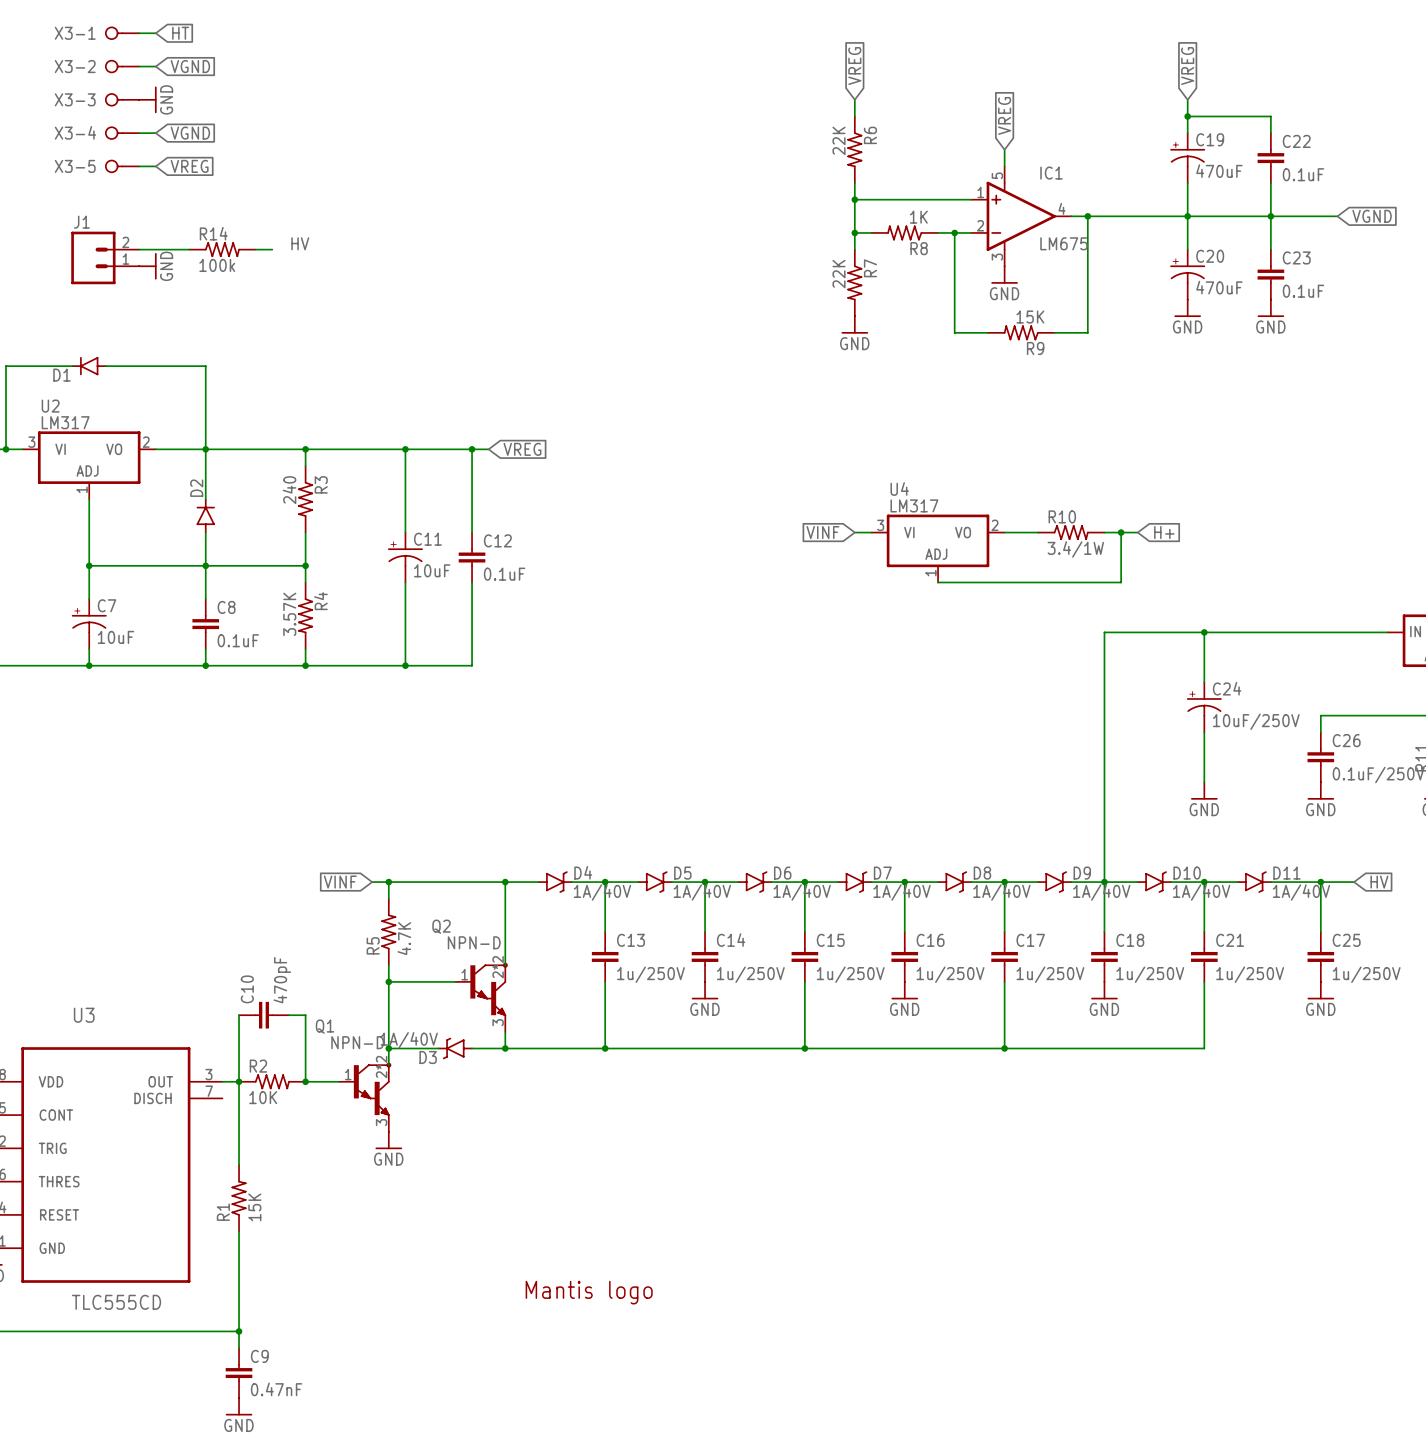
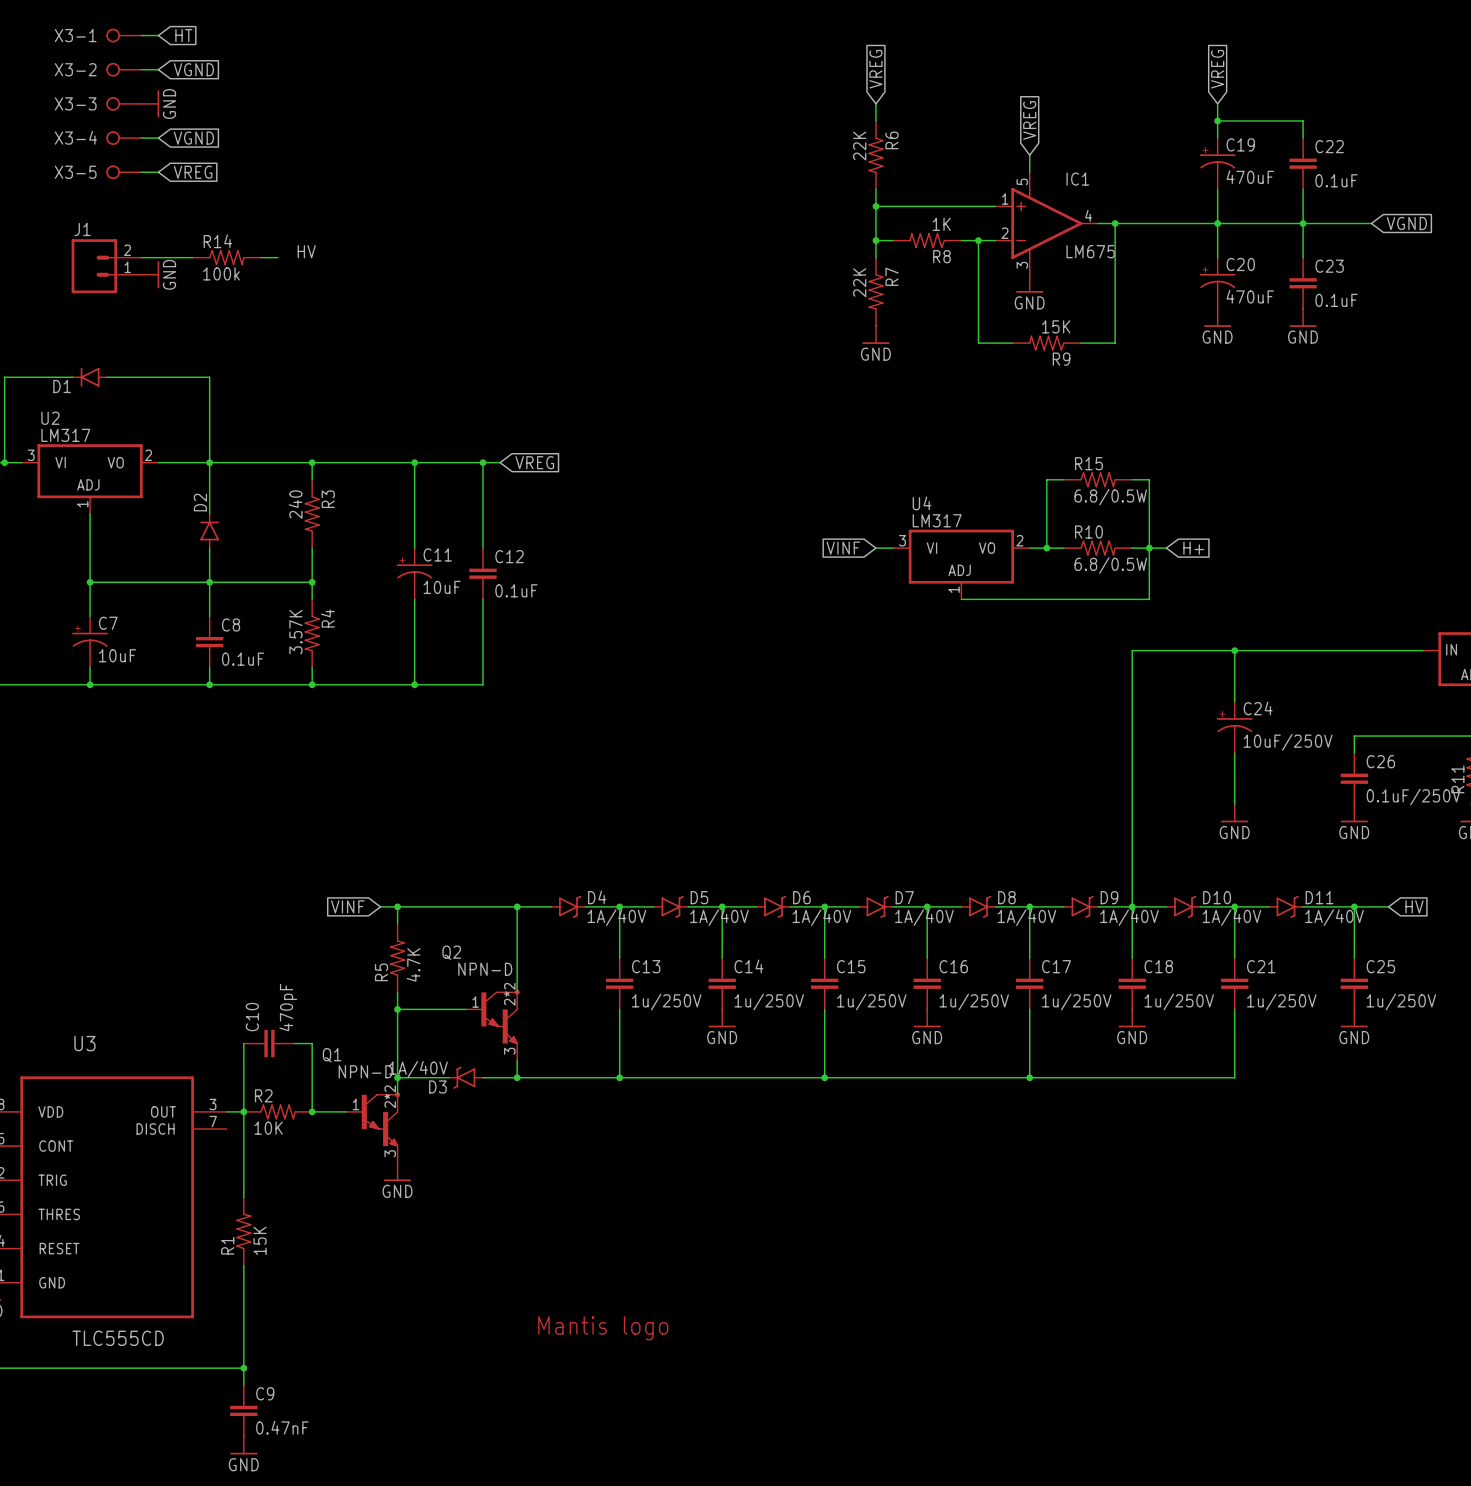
wire: none -> (1063, 479) (1046, 479) (1046, 548)
R15: none -> 6.8/0.5W (1098, 479)
wire: none -> (1132, 479) (1149, 479) (1149, 548)
junction: none -> (1046, 548)
R10 value: 3.4/1W (1075, 549) -> 6.8/0.5W (1110, 565)

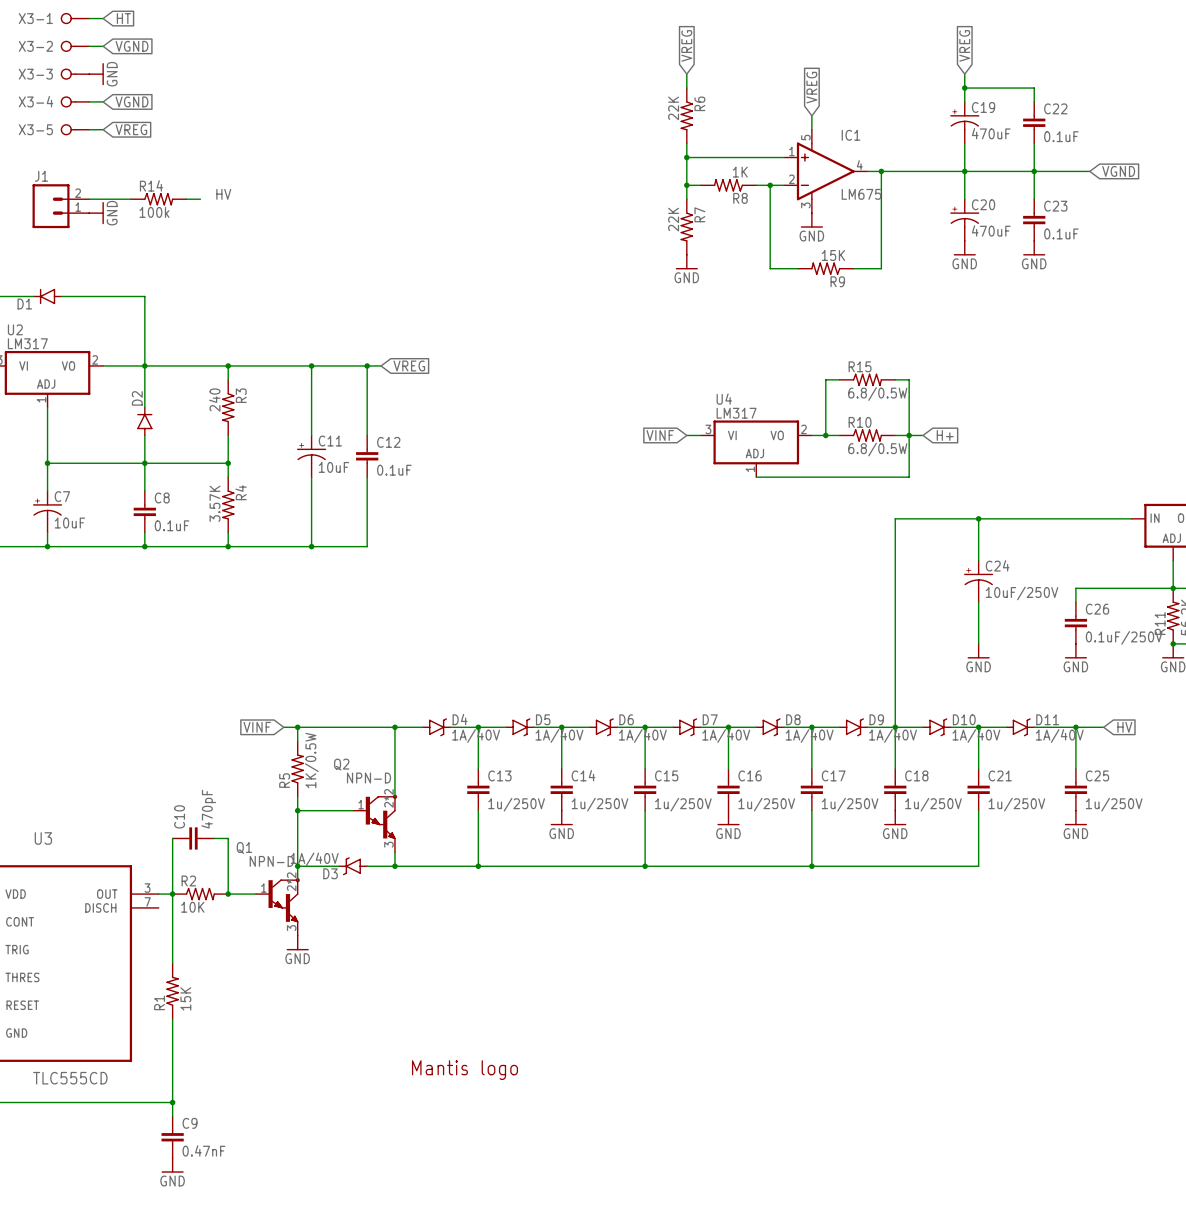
R5 value: 4.7K (413, 964) -> 1K/0.5W (311, 760)

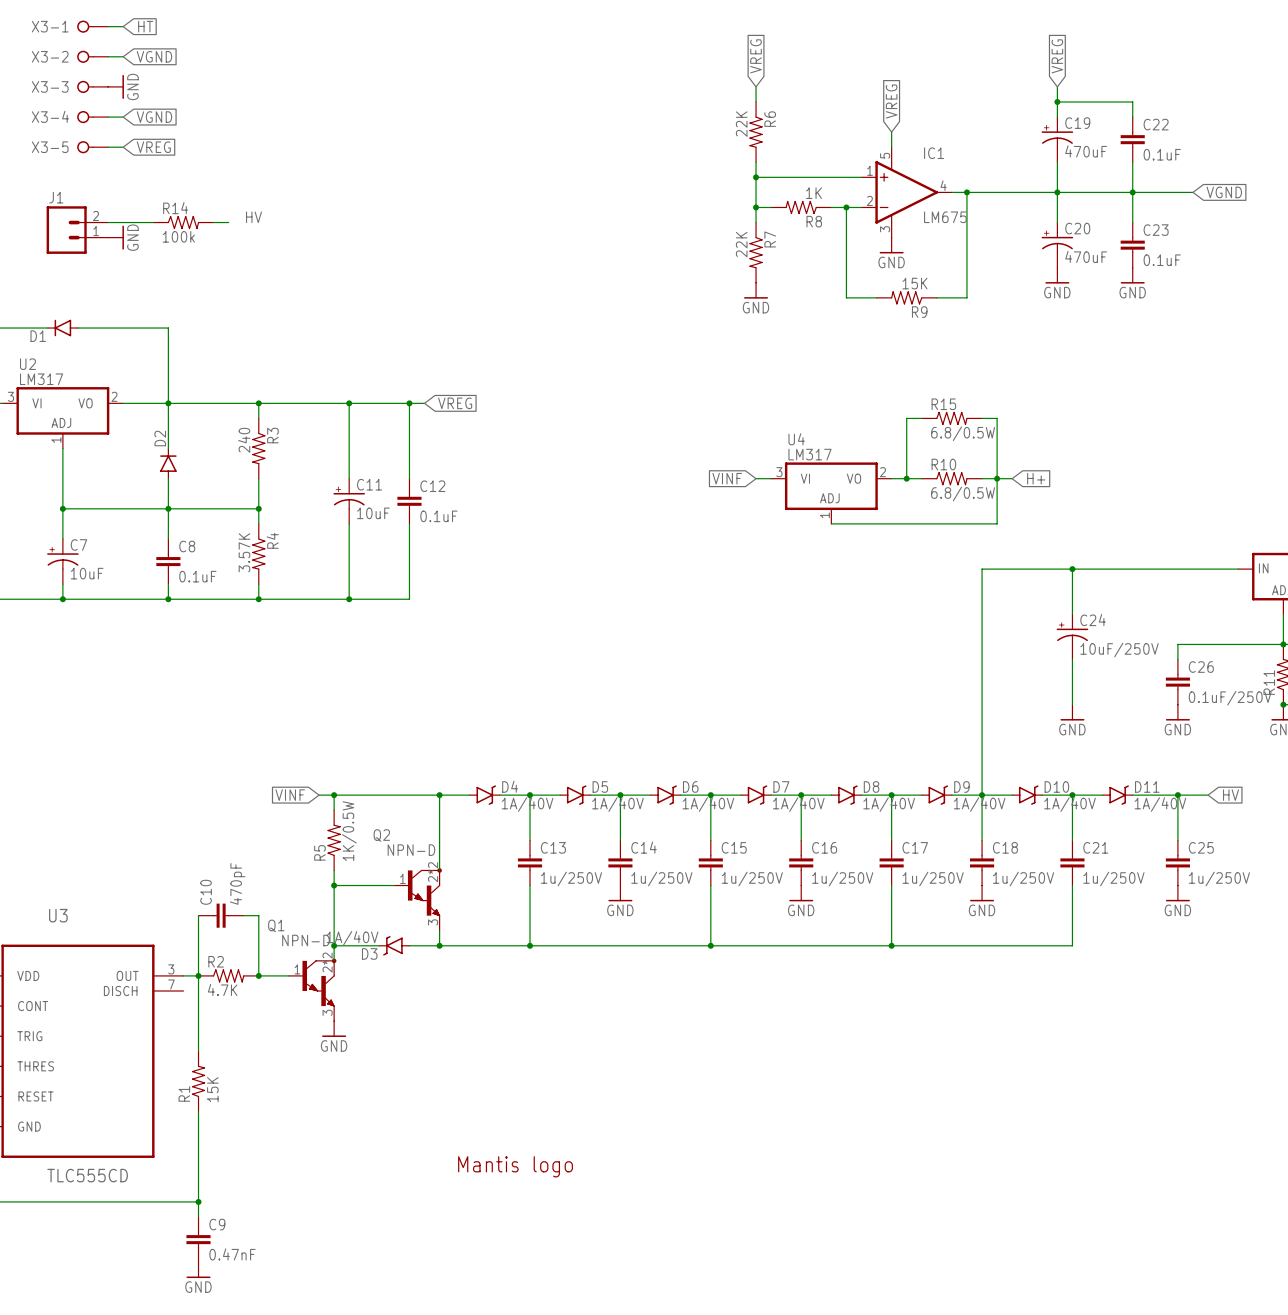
R2 value: 10K (192, 907) -> 4.7K (222, 990)

